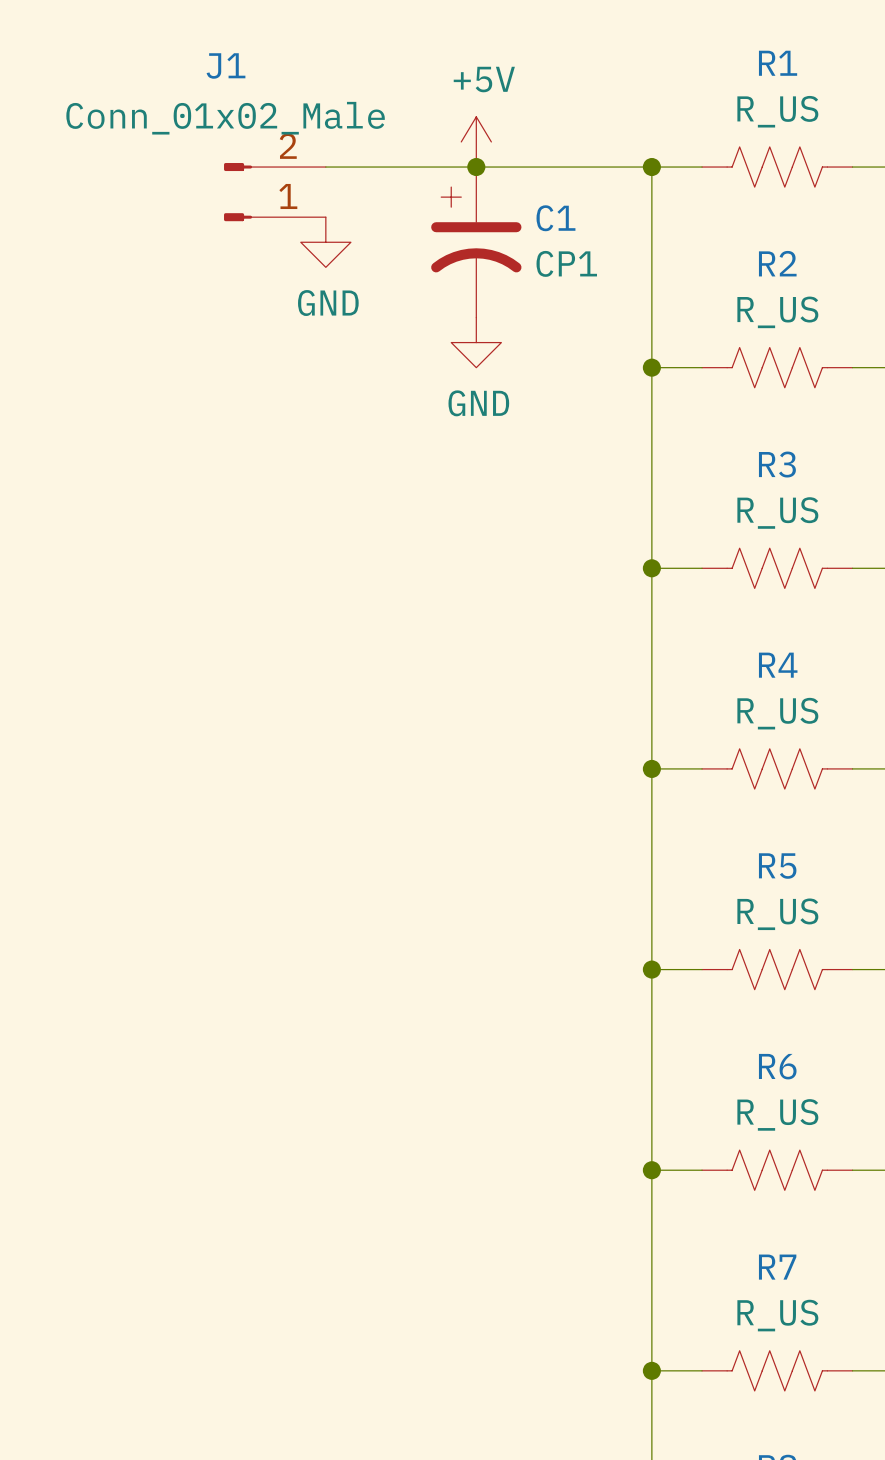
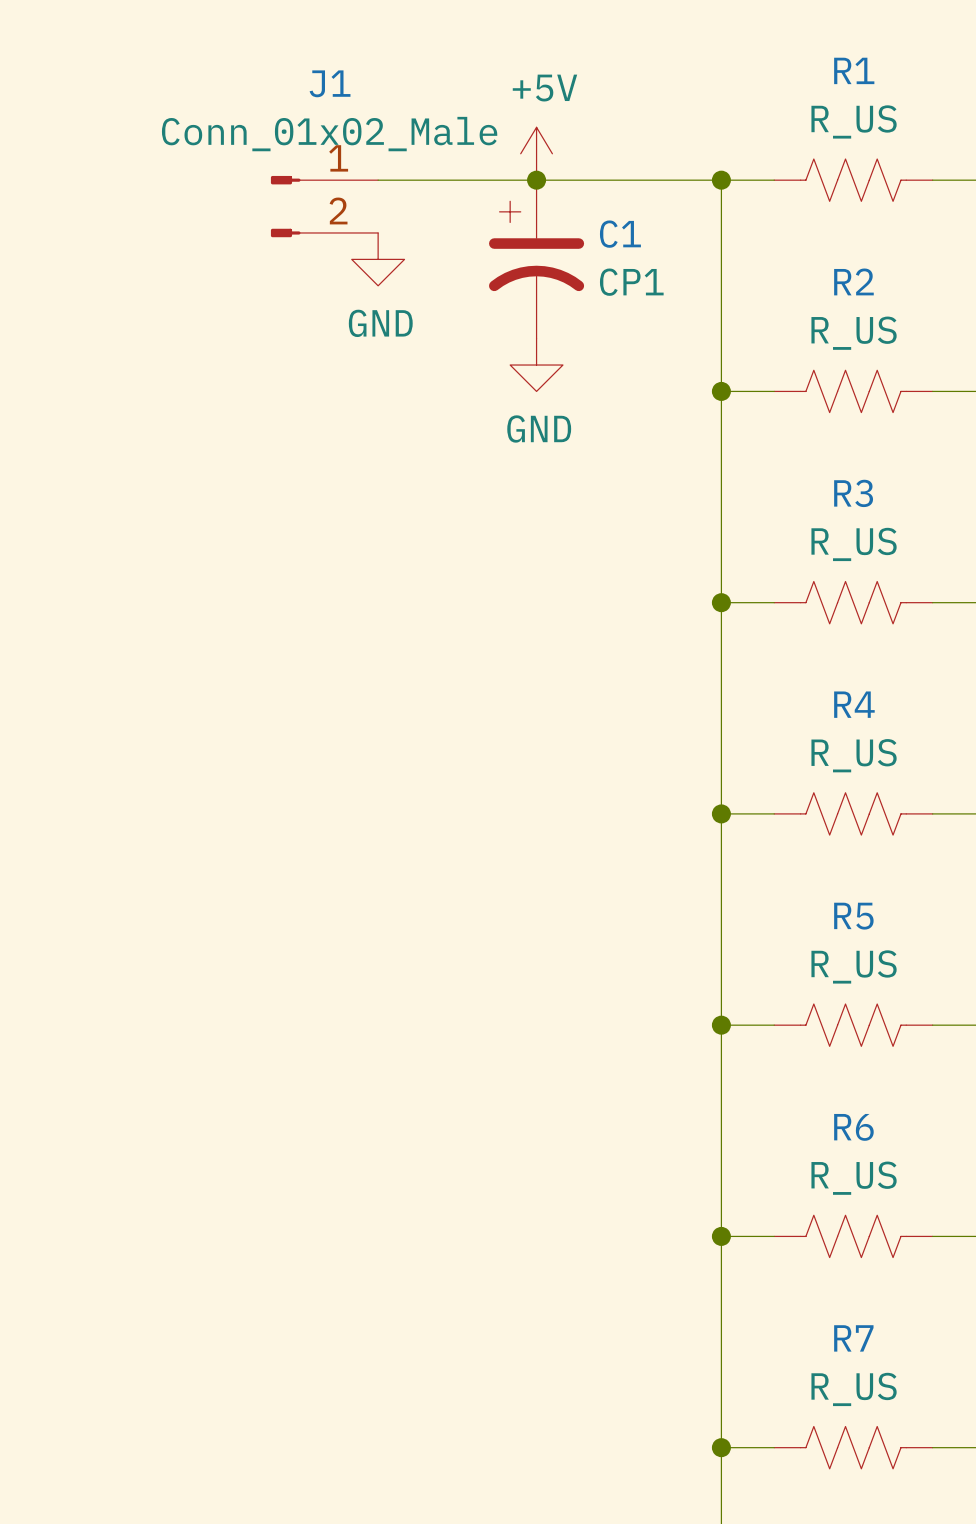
J1 name position: J1 (226, 65) -> J1 (330, 83)
J1 value position: Conn_01x02_Male (225, 118) -> Conn_01x02_Male (329, 134)
J1 flip: as is (238, 192) -> up-down (285, 206)

